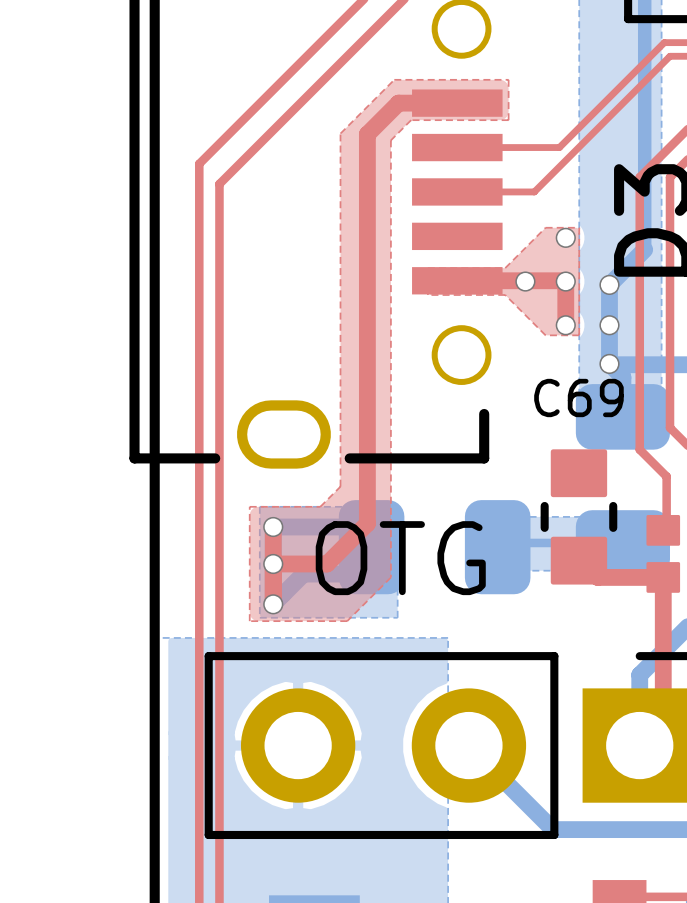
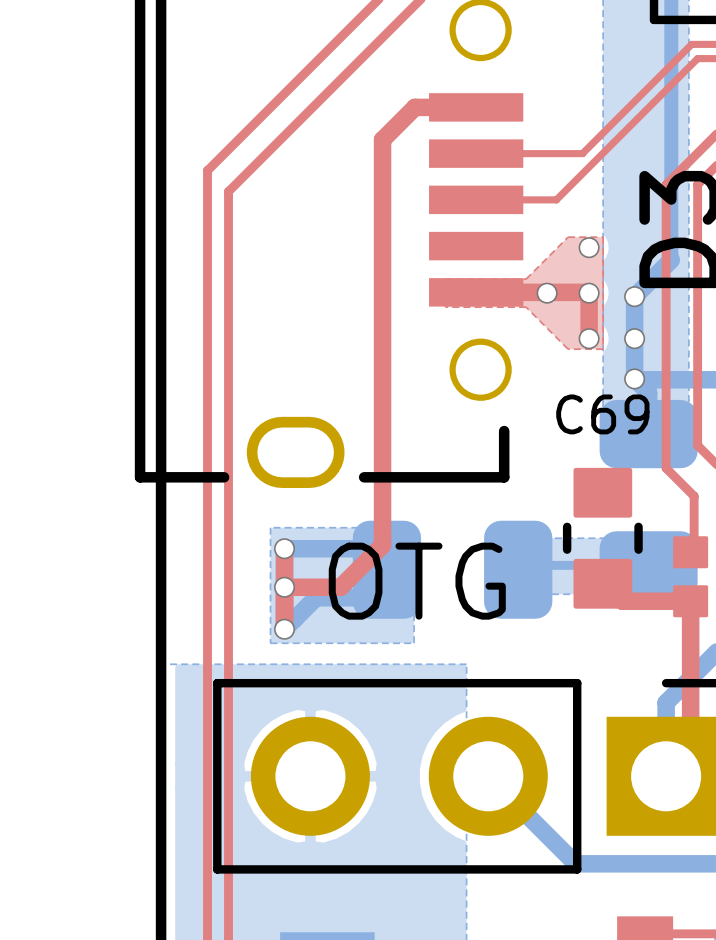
top zone outline: (394, 79) (340, 133) (340, 486) (320, 506) (249, 506) (249, 621) (347, 621) (390, 577) (390, 140) (411, 120) (508, 120) (508, 79) (394, 79) -> none

